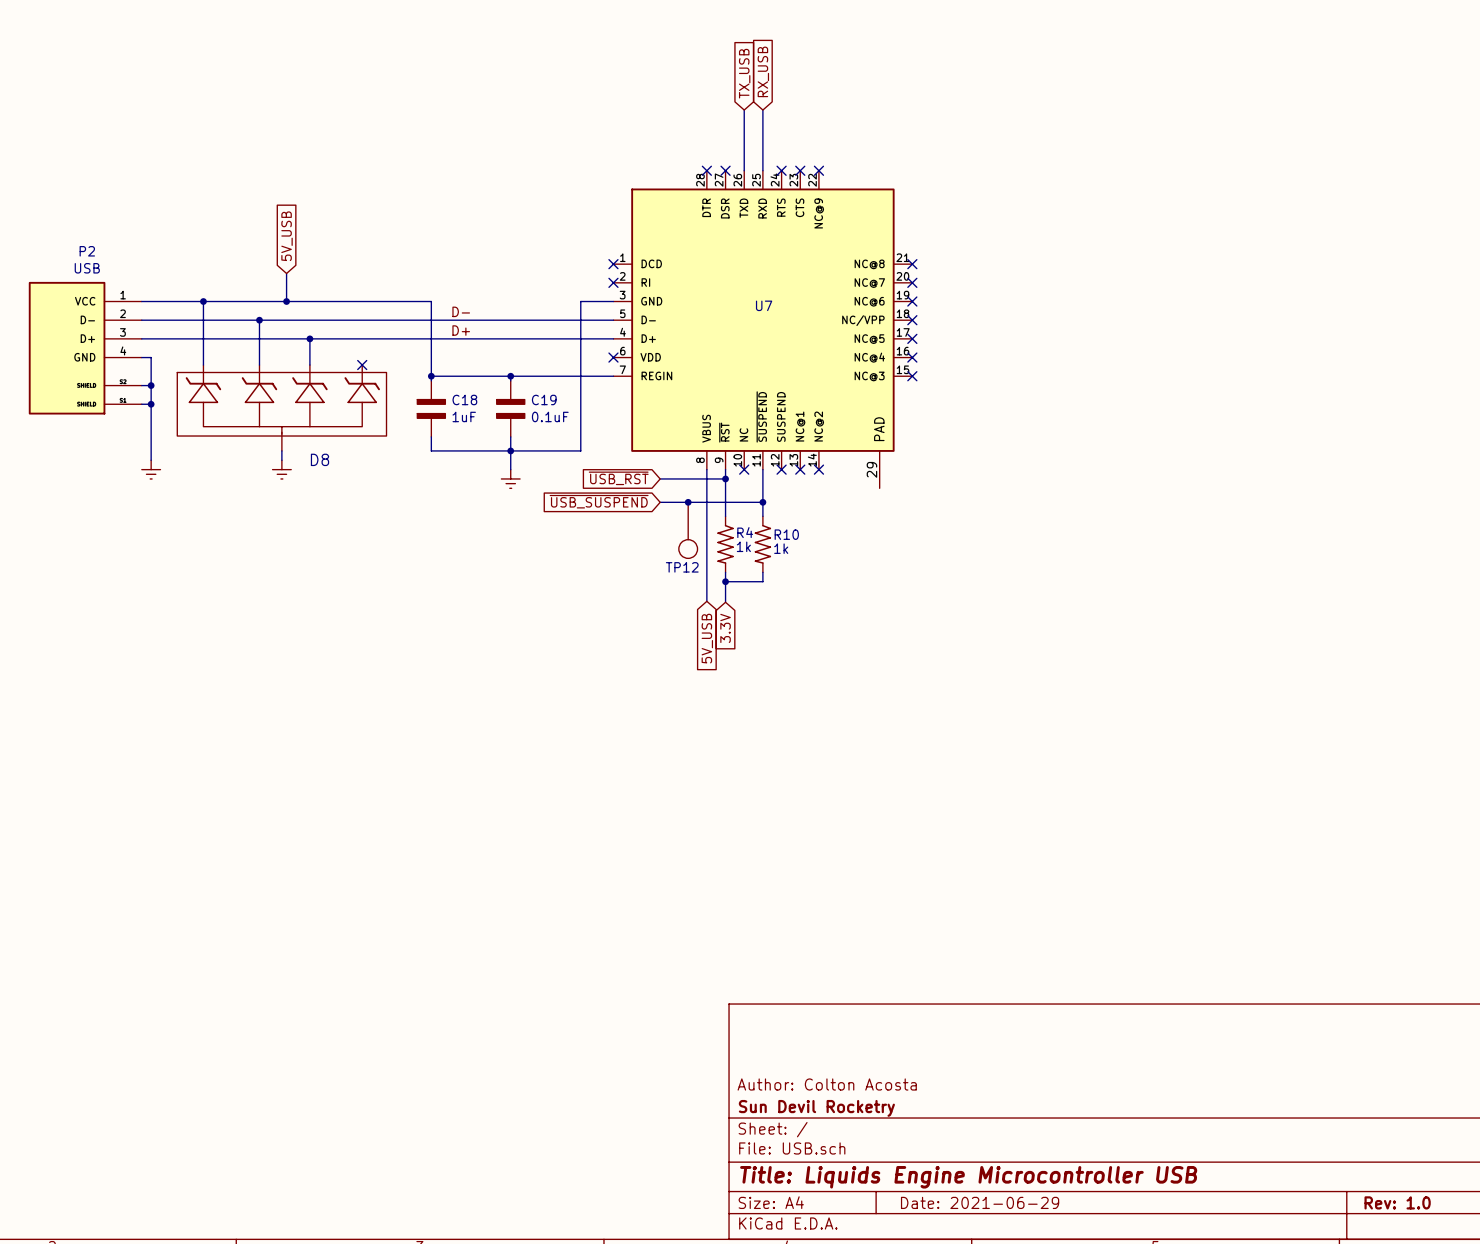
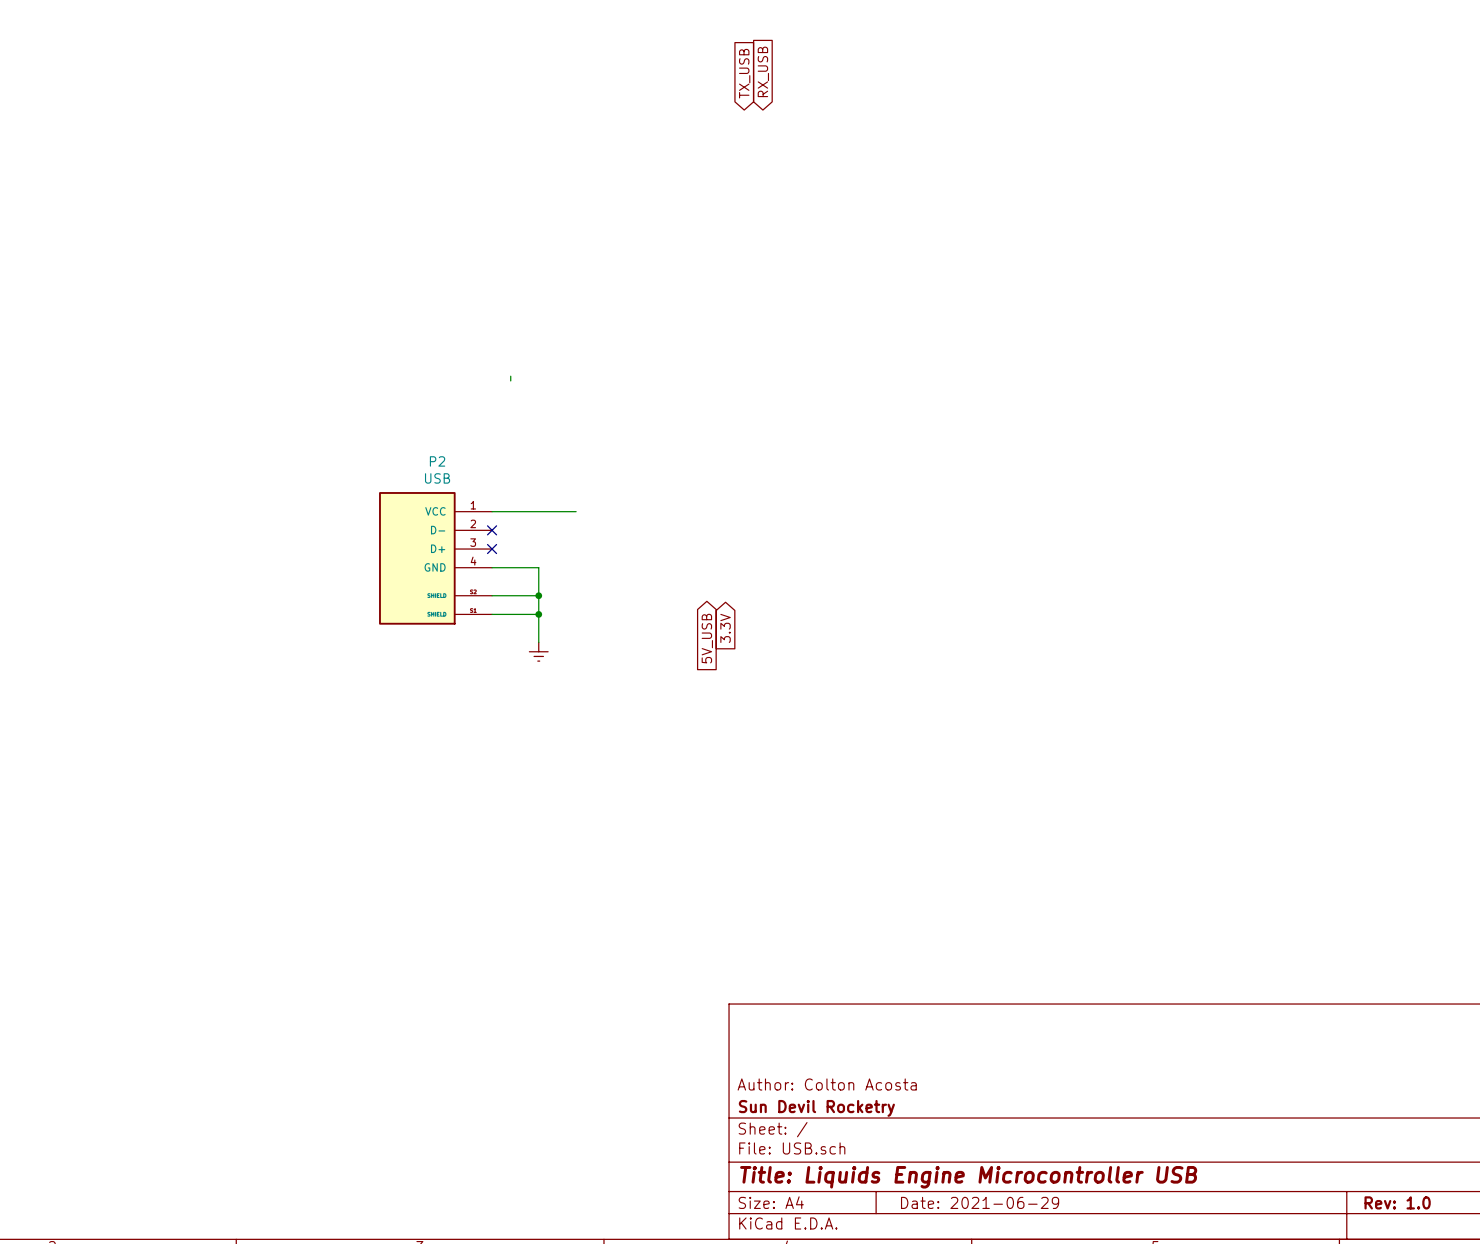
wire: (744, 110) (744, 170) -> none
wire: (762, 110) (762, 170) -> none
no-connect mark: (706, 170) -> none
no-connect mark: (725, 170) -> none
no-connect mark: (781, 170) -> none
no-connect mark: (800, 170) -> none
no-connect mark: (818, 170) -> none
global label: 5V_USB (287, 236) -> none
no-connect mark: (613, 264) -> none
no-connect mark: (912, 264) -> none
wire: (286, 273) (286, 301) -> none
no-connect mark: (613, 282) -> none
no-connect mark: (912, 282) -> none
wire: (141, 301) (431, 301) (431, 380) -> none
wire: (203, 301) (203, 365) -> none
junction: (203, 301) -> none
junction: (286, 301) -> none
wire: (613, 301) (580, 301) (580, 450) (431, 450) (431, 436) -> none
no-connect mark: (912, 301) -> none
label: D- (461, 311) -> none
wire: (141, 320) (613, 320) -> none
wire: (259, 320) (259, 365) -> none
junction: (259, 320) -> none
no-connect mark: (912, 320) -> none
U7: (762, 329) -> none
label: D+ (461, 330) -> none
wire: (141, 338) (613, 338) -> none
wire: (309, 338) (309, 365) -> none
junction: (309, 338) -> none
no-connect mark: (912, 338) -> none
P2 position: (85, 348) -> (435, 558)
wire: (141, 357) (151, 357) (151, 460) -> none
no-connect mark: (613, 357) -> none
no-connect mark: (912, 357) -> none
no-connect mark: (362, 365) -> none
wire: (431, 376) (613, 376) -> none
junction: (431, 376) -> none
junction: (510, 376) -> none
no-connect mark: (912, 376) -> none
wire: (141, 385) (151, 385) -> none
junction: (151, 385) -> none
wire: (141, 404) (151, 404) -> none
junction: (151, 404) -> none
D8: (281, 407) -> none
C18: 1uF (431, 408) -> none
C19: 0.1uF (510, 408) -> none
wire: (510, 436) (510, 469) -> none
wire: (281, 450) (281, 460) -> none
junction: (510, 450) -> none
power symbol: (151, 469) -> none
power symbol: (281, 469) -> none
wire: (706, 469) (706, 601) -> none
wire: (725, 469) (725, 516) -> none
no-connect mark: (744, 469) -> none
wire: (762, 469) (762, 516) -> none
no-connect mark: (781, 469) -> none
no-connect mark: (800, 469) -> none
no-connect mark: (818, 469) -> none
power symbol: (510, 478) -> none
global label: ~{USB_RST} (618, 478) -> none
wire: (660, 478) (725, 478) -> none
junction: (725, 478) -> none
global label: ~{USB_SUSPEND} (599, 501) -> none
wire: (660, 502) (762, 502) -> none
junction: (688, 502) -> none
junction: (762, 502) -> none
wire: none -> (492, 511) (576, 511)
no-connect mark: none -> (492, 530)
TP12: (688, 530) -> none
R4: 1k (725, 544) -> none
R10: 1k (762, 544) -> none
no-connect mark: none -> (492, 549)
wire: none -> (492, 567) (538, 567) (538, 642)
wire: (725, 572) (725, 602) -> none
wire: (762, 572) (762, 581) (725, 581) -> none
junction: (725, 581) -> none
wire: none -> (492, 595) (538, 595)
junction: none -> (538, 595)
wire: none -> (492, 614) (538, 614)
junction: none -> (538, 614)
power symbol: none -> (538, 651)

